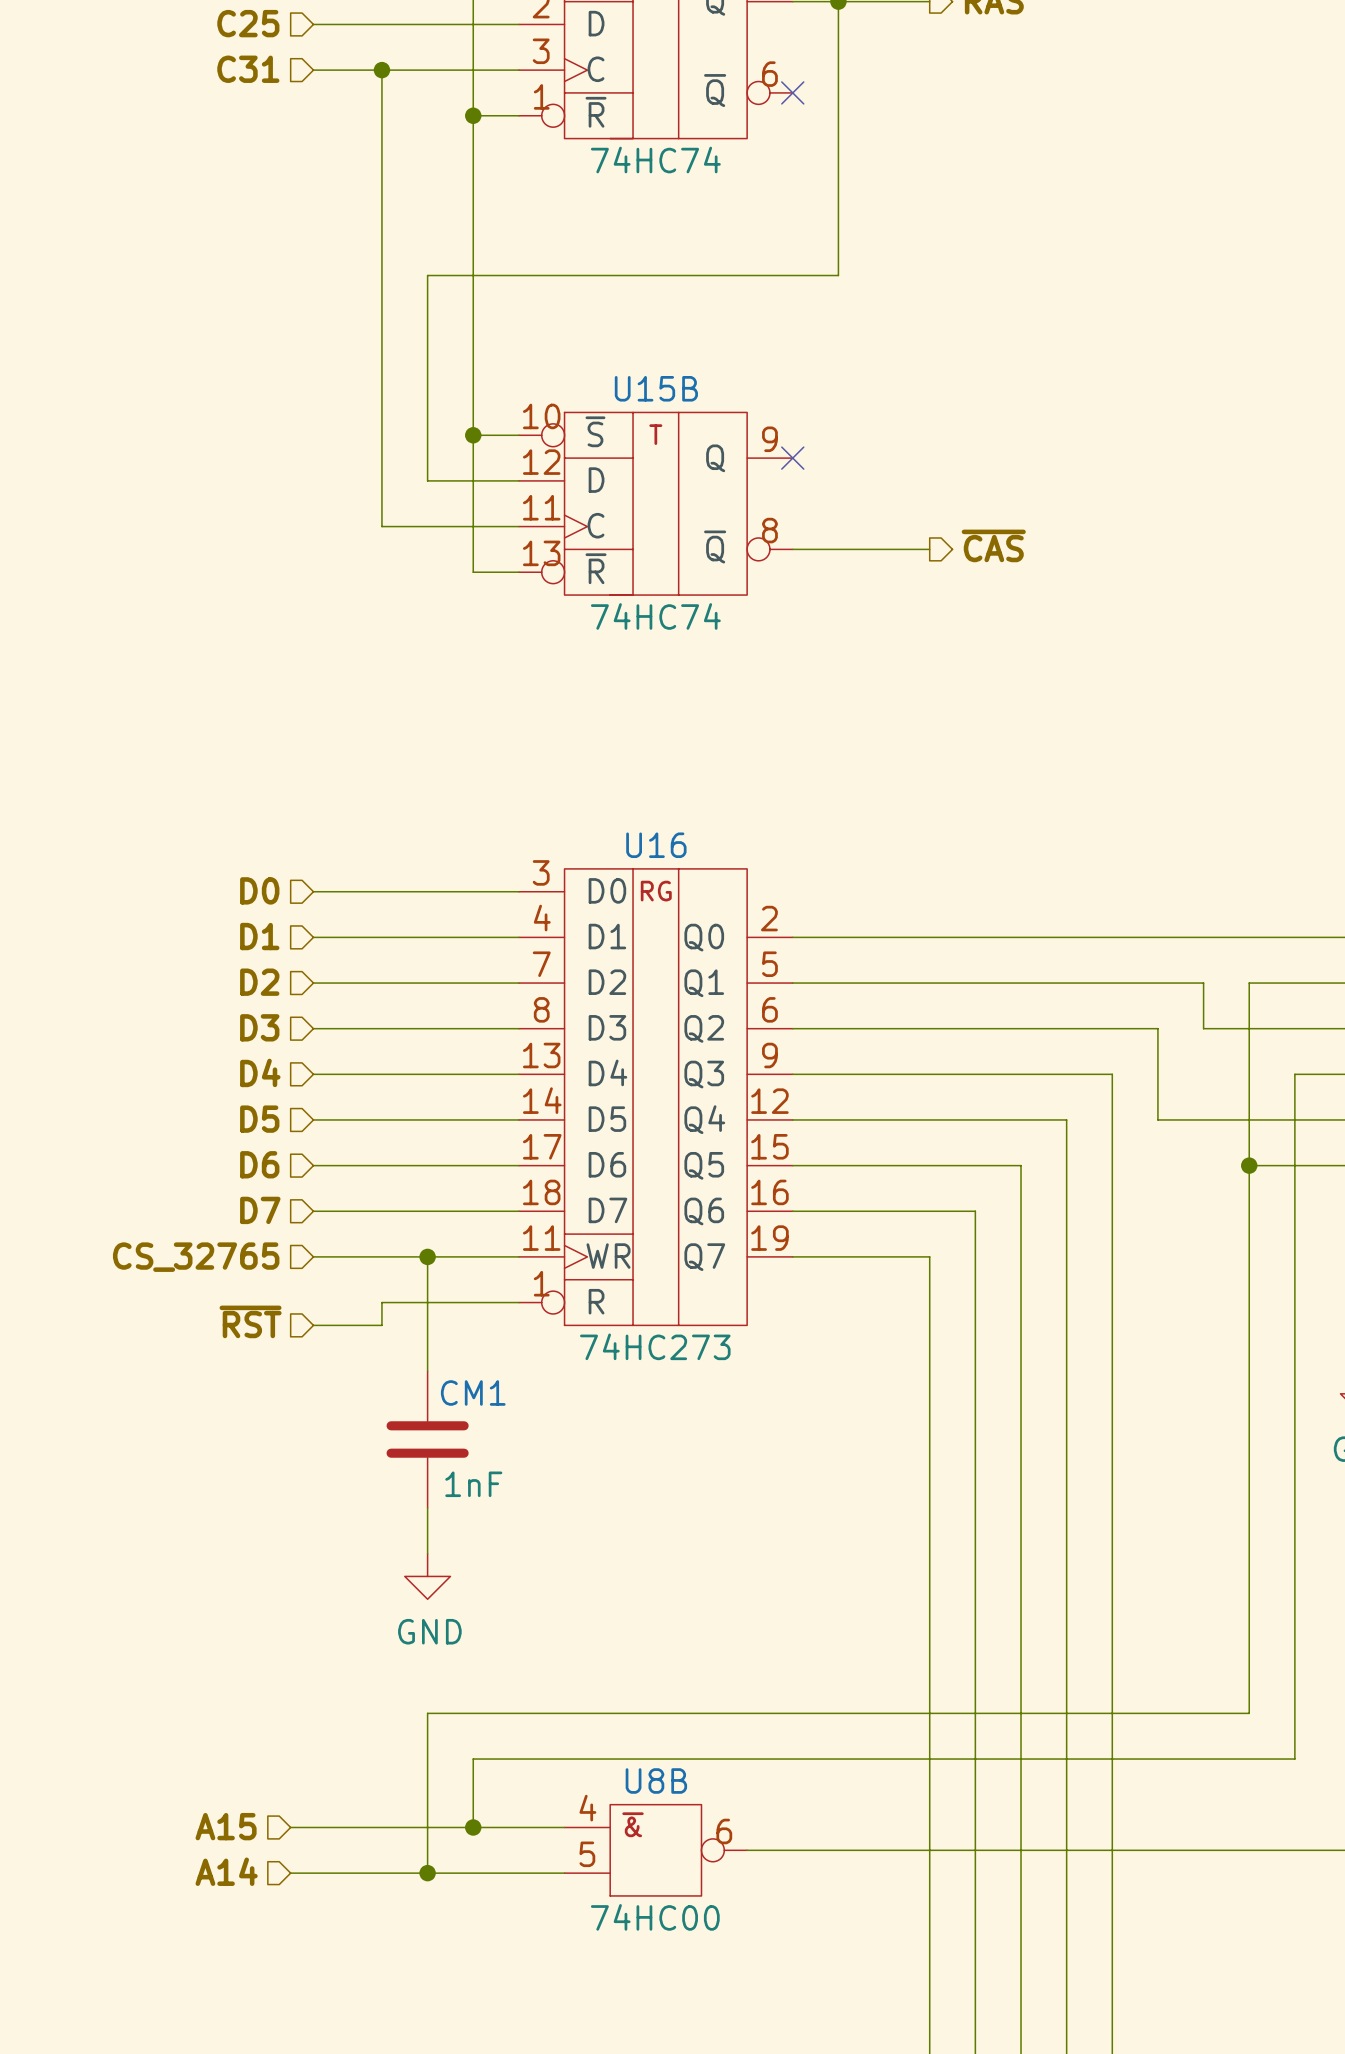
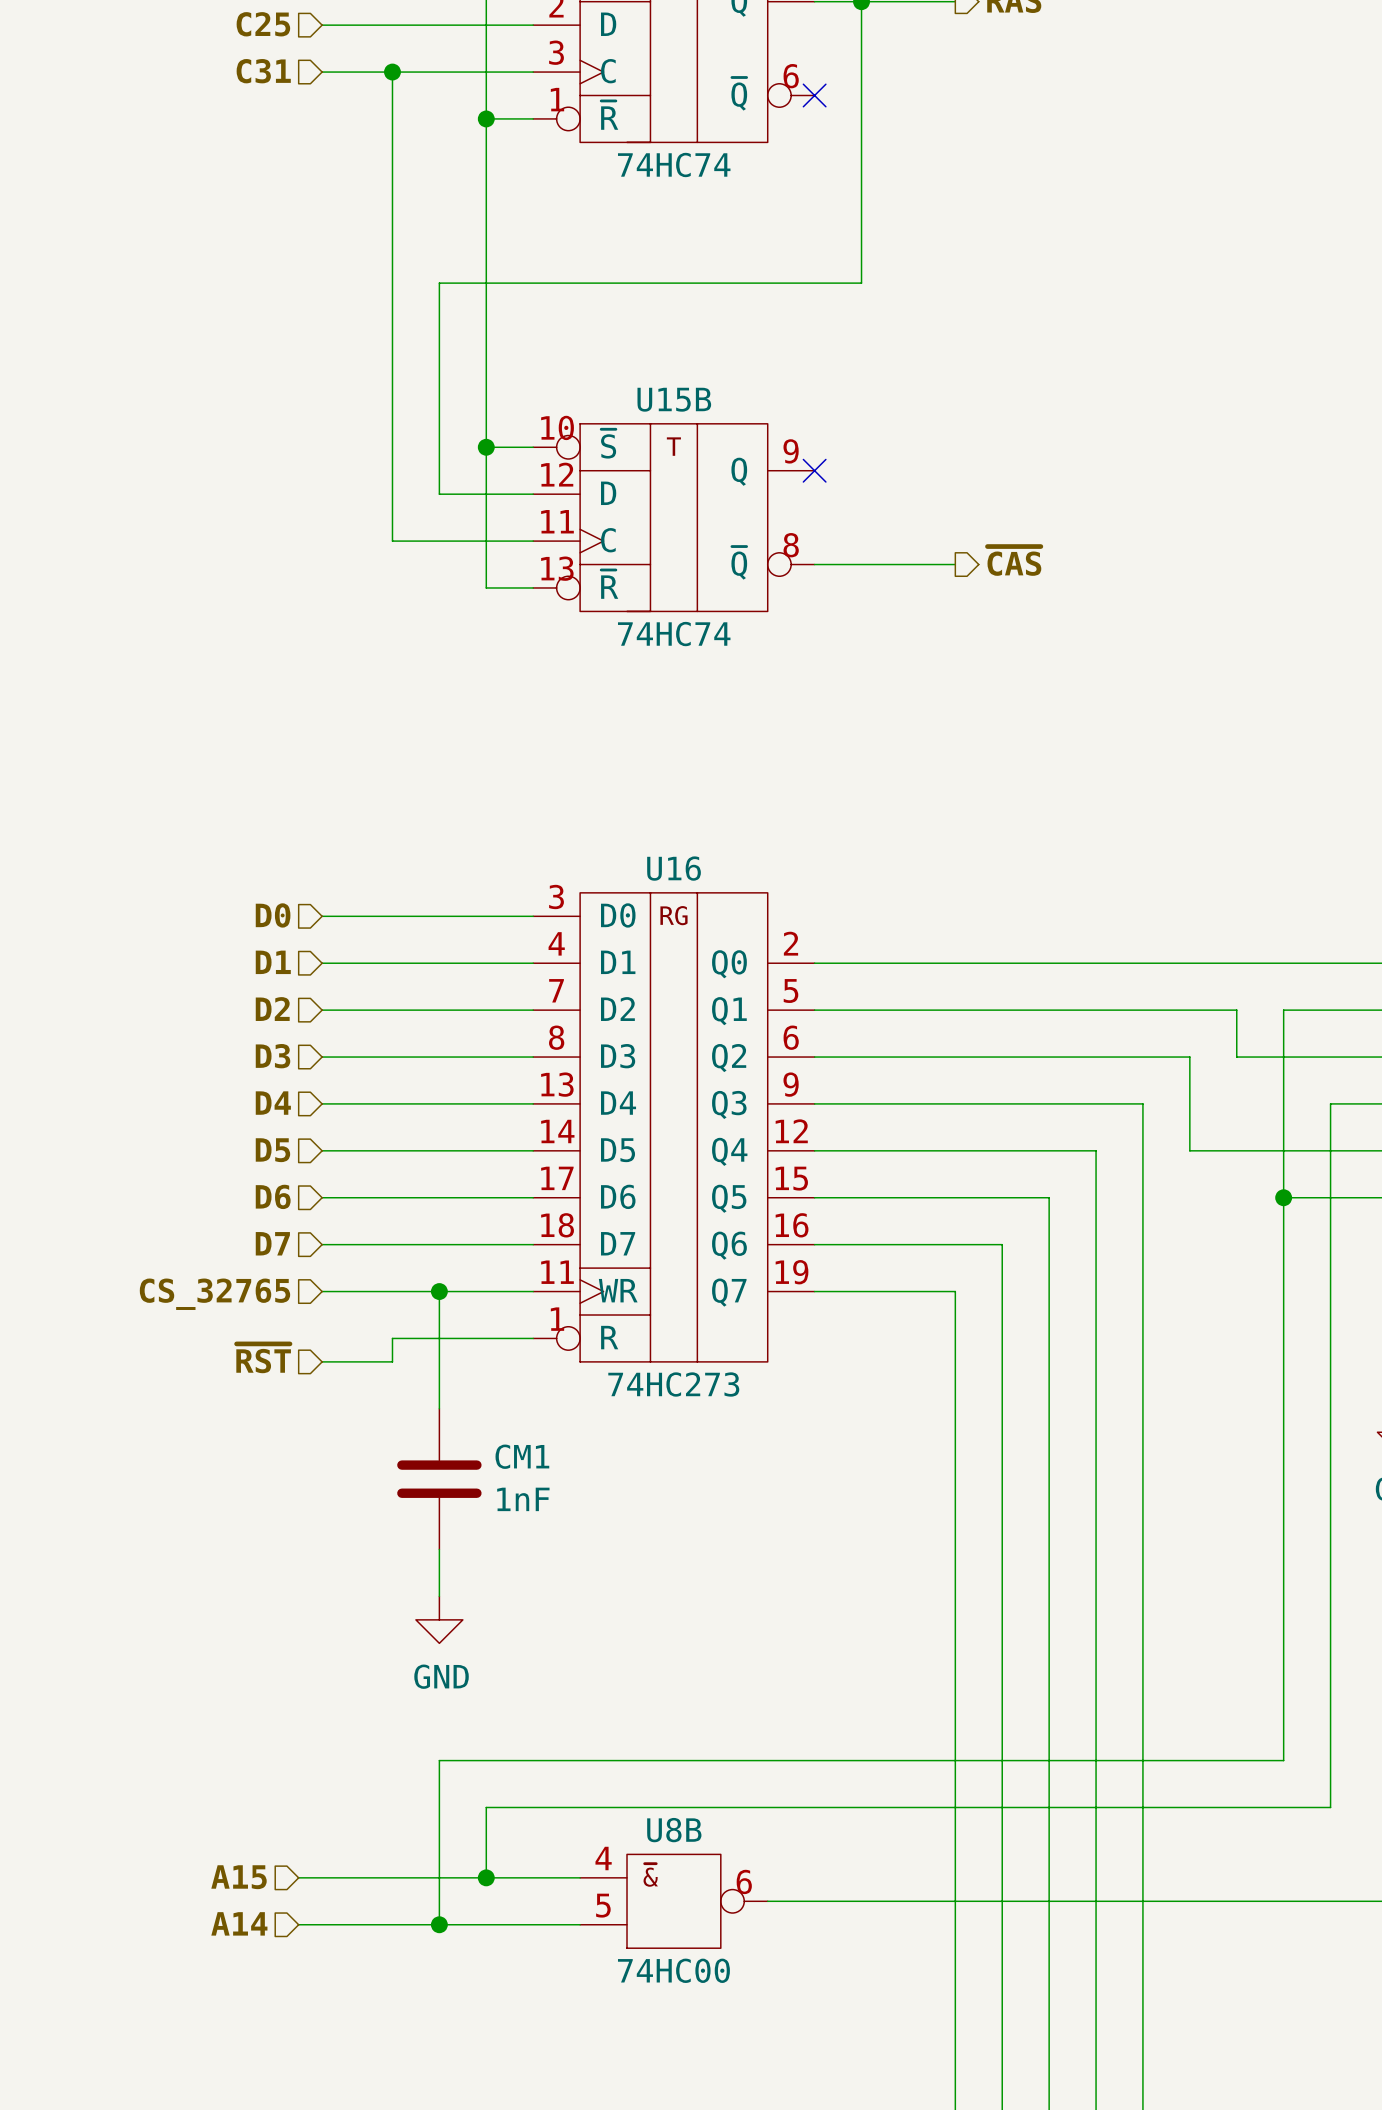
CM1 name position: CM1 (473, 1393) -> CM1 (522, 1456)
CM1 value position: 1nF (473, 1484) -> 1nF (523, 1499)

